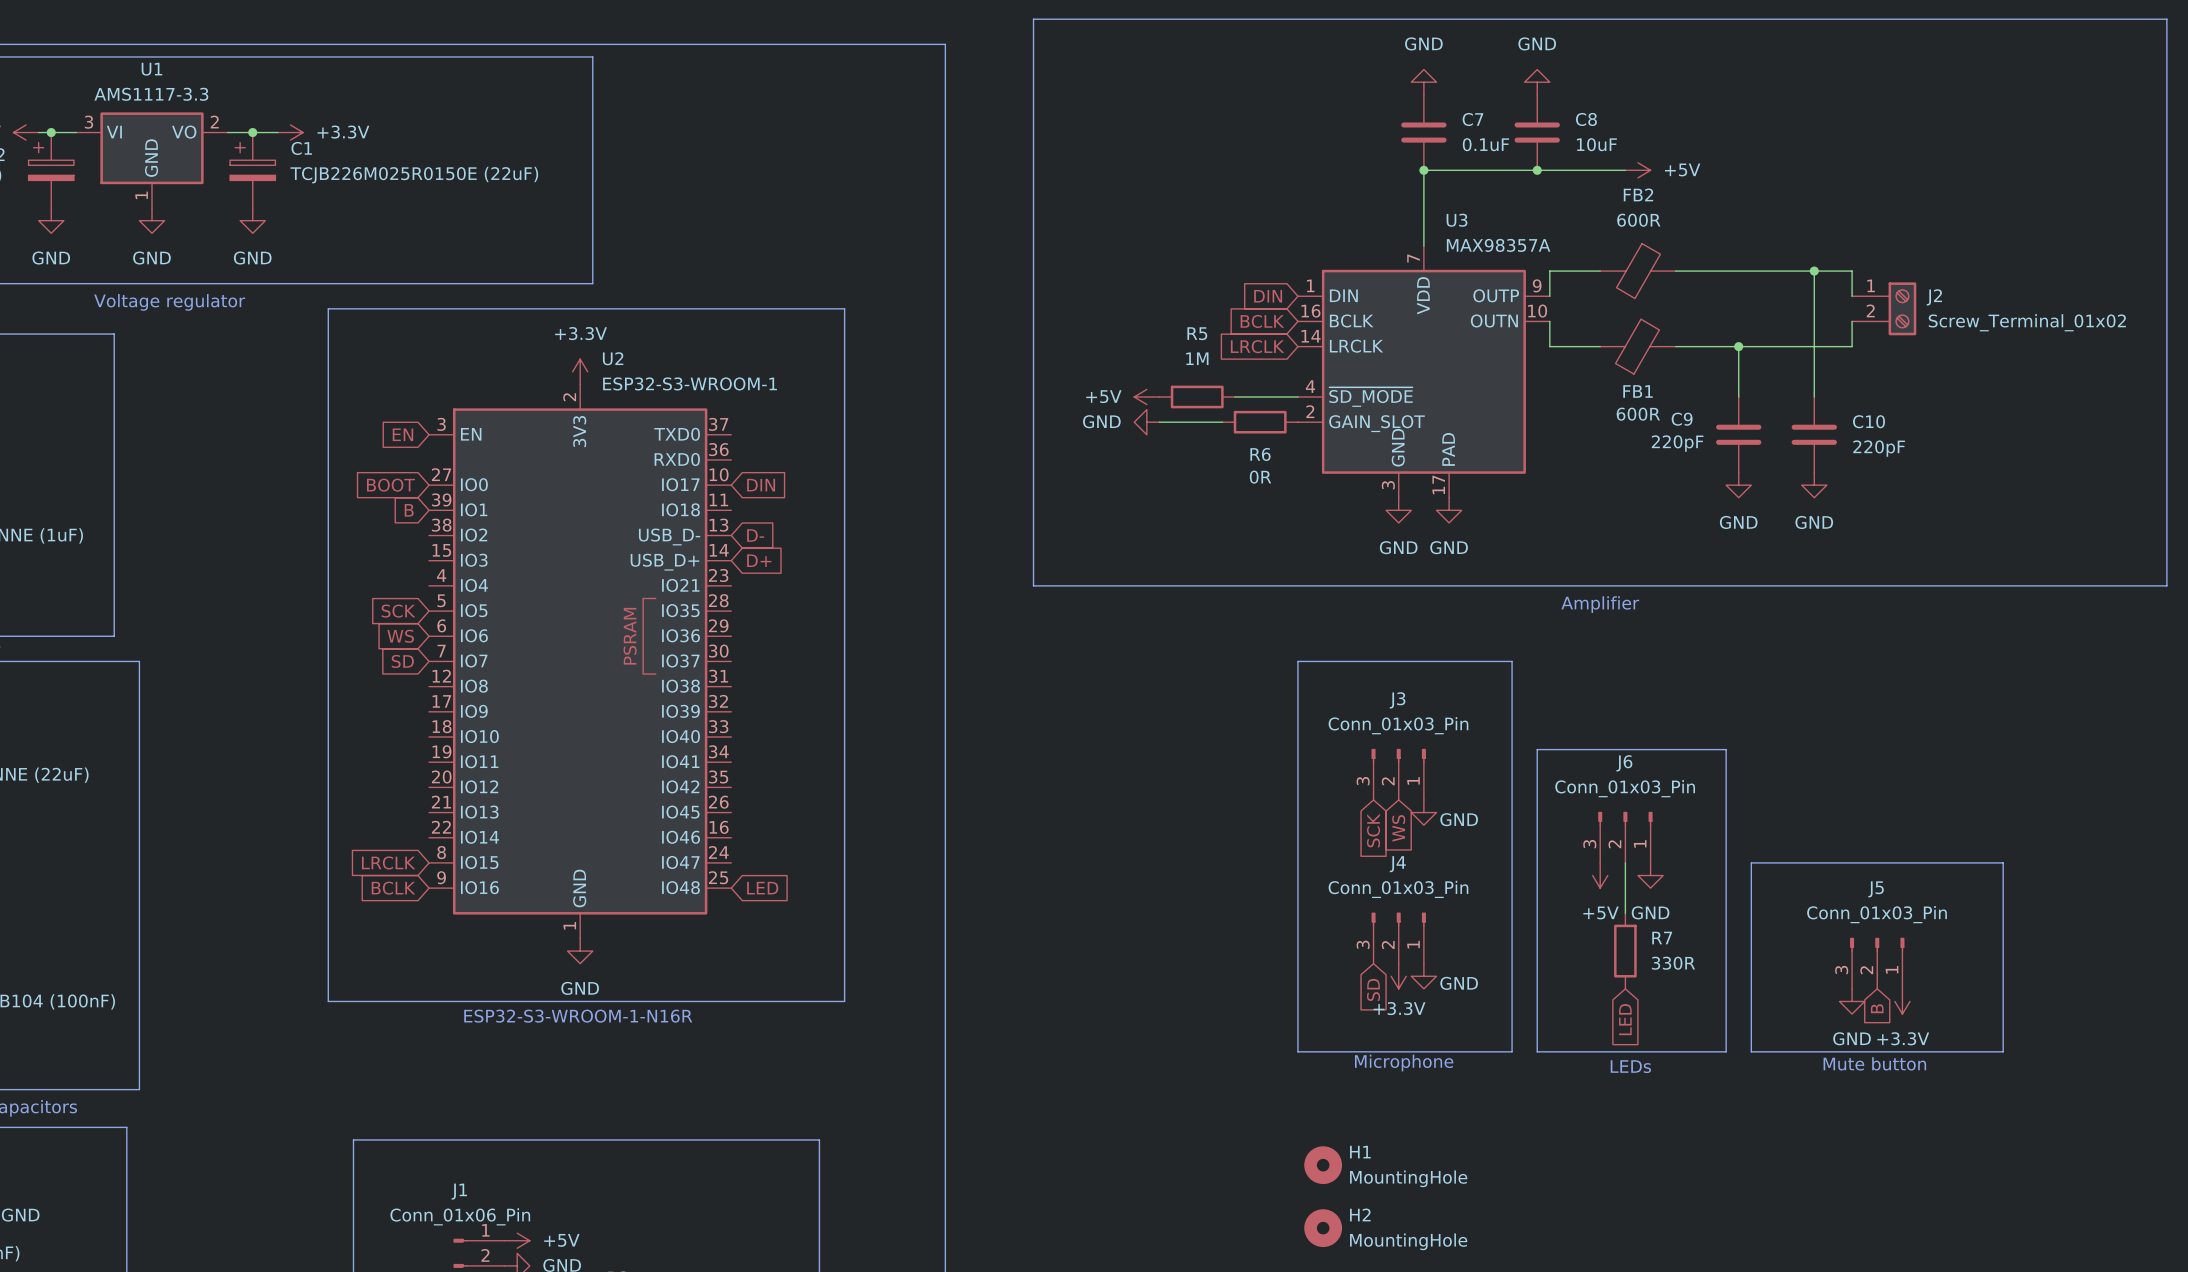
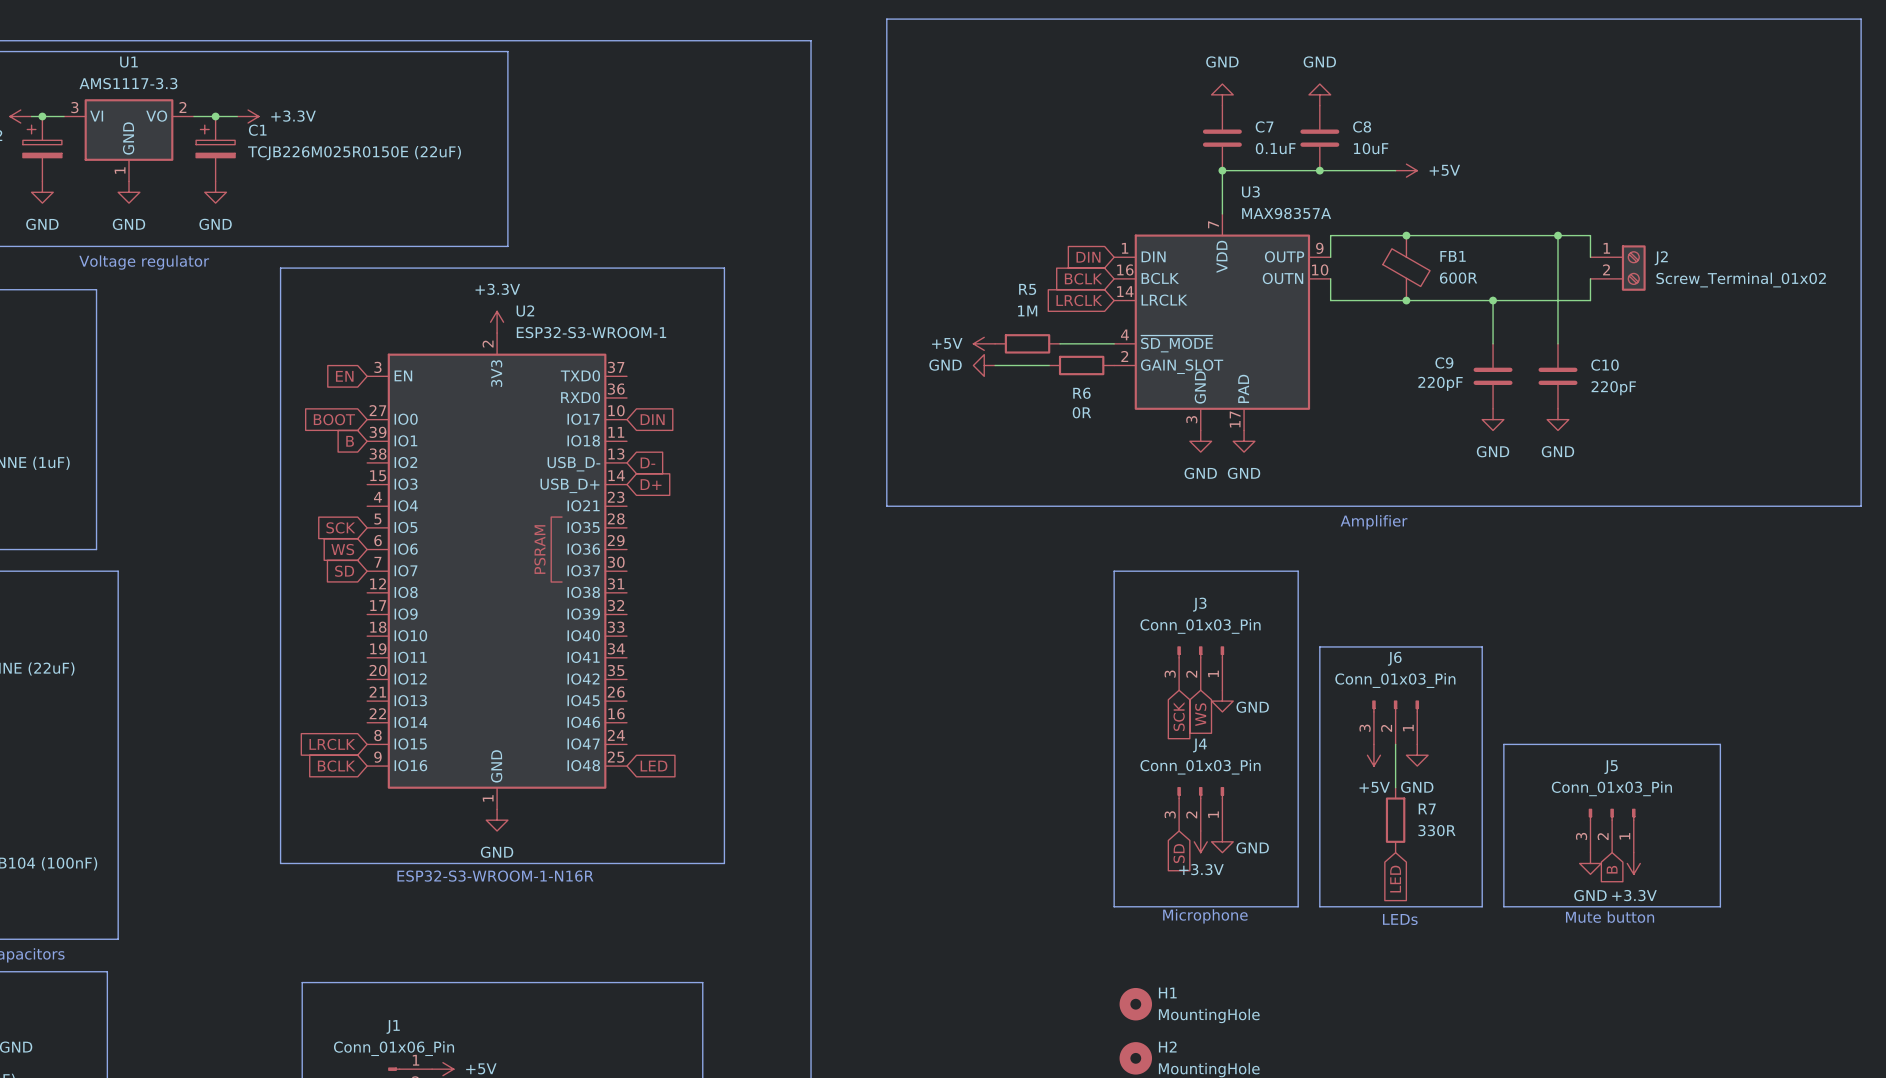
power symbol position: GND (1423, 82) -> GND (1222, 94)
power symbol position: GND (1537, 82) -> GND (1319, 94)
C7 position: (1423, 132) -> (1222, 138)
C8 position: (1537, 132) -> (1319, 138)
junction position: (1423, 170) -> (1222, 170)
junction position: (1537, 170) -> (1319, 170)
wire: (1625, 170) (1423, 170) (1423, 195) -> (1395, 170) (1222, 170)
power symbol position: +5V (1637, 170) -> +5V (1406, 170)
junction: none -> (1406, 235)
FB2: 600R (1637, 271) -> none
junction: none -> (1406, 300)
FB1 rotation: 0° (1637, 346) -> 90° clockwise (1406, 267)
FB1 name position: FB1 (1638, 391) -> FB1 (1453, 256)
FB1 value position: 600R (1638, 414) -> 600R (1458, 278)

